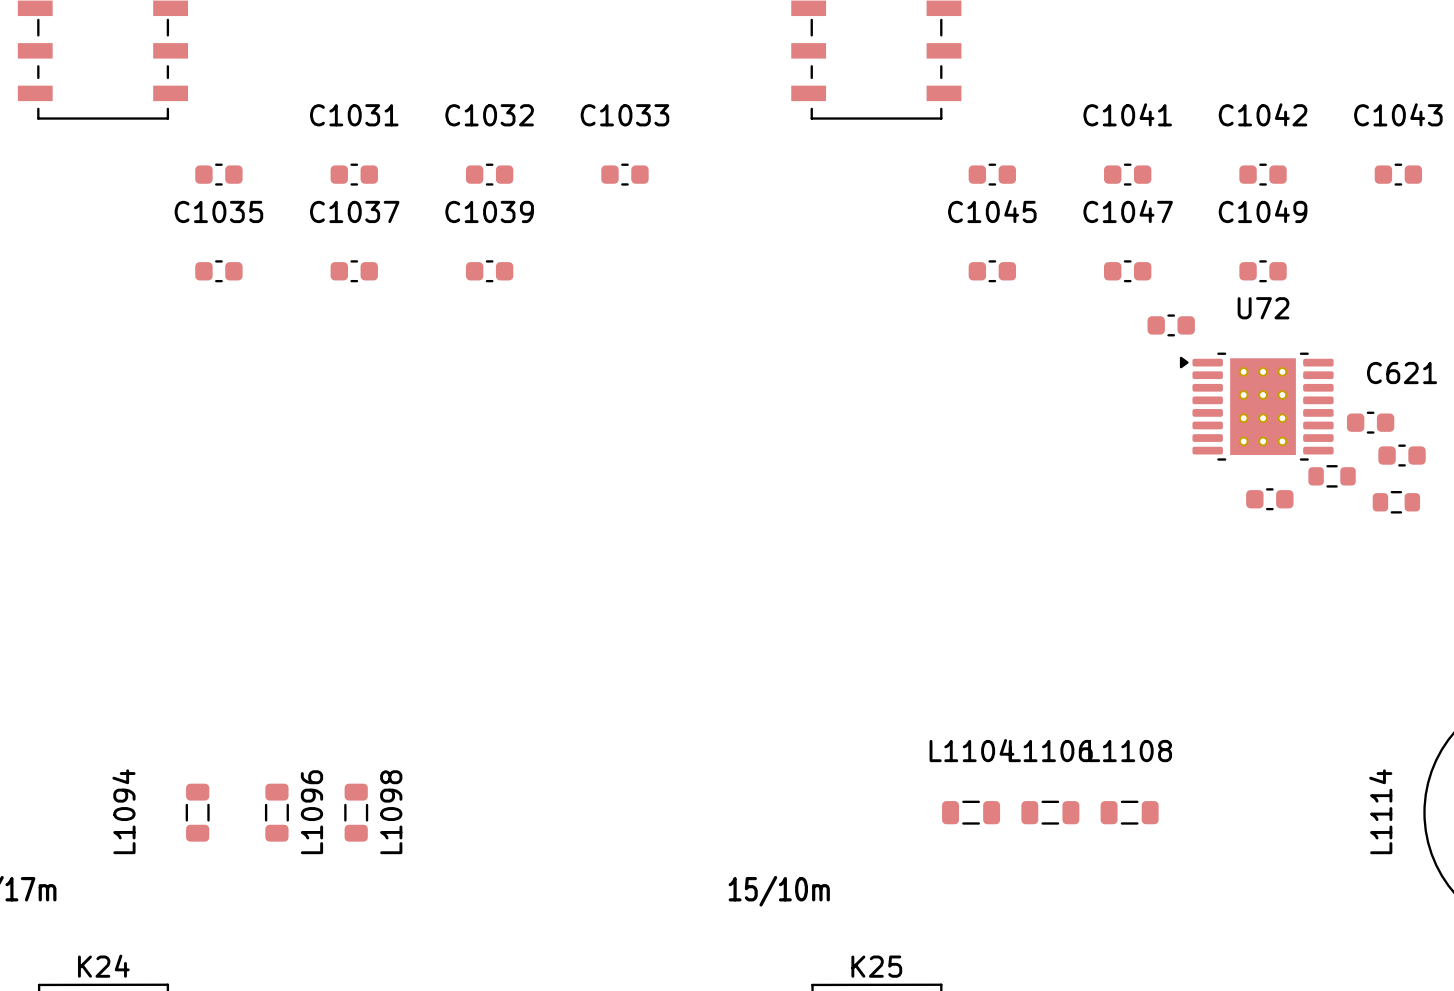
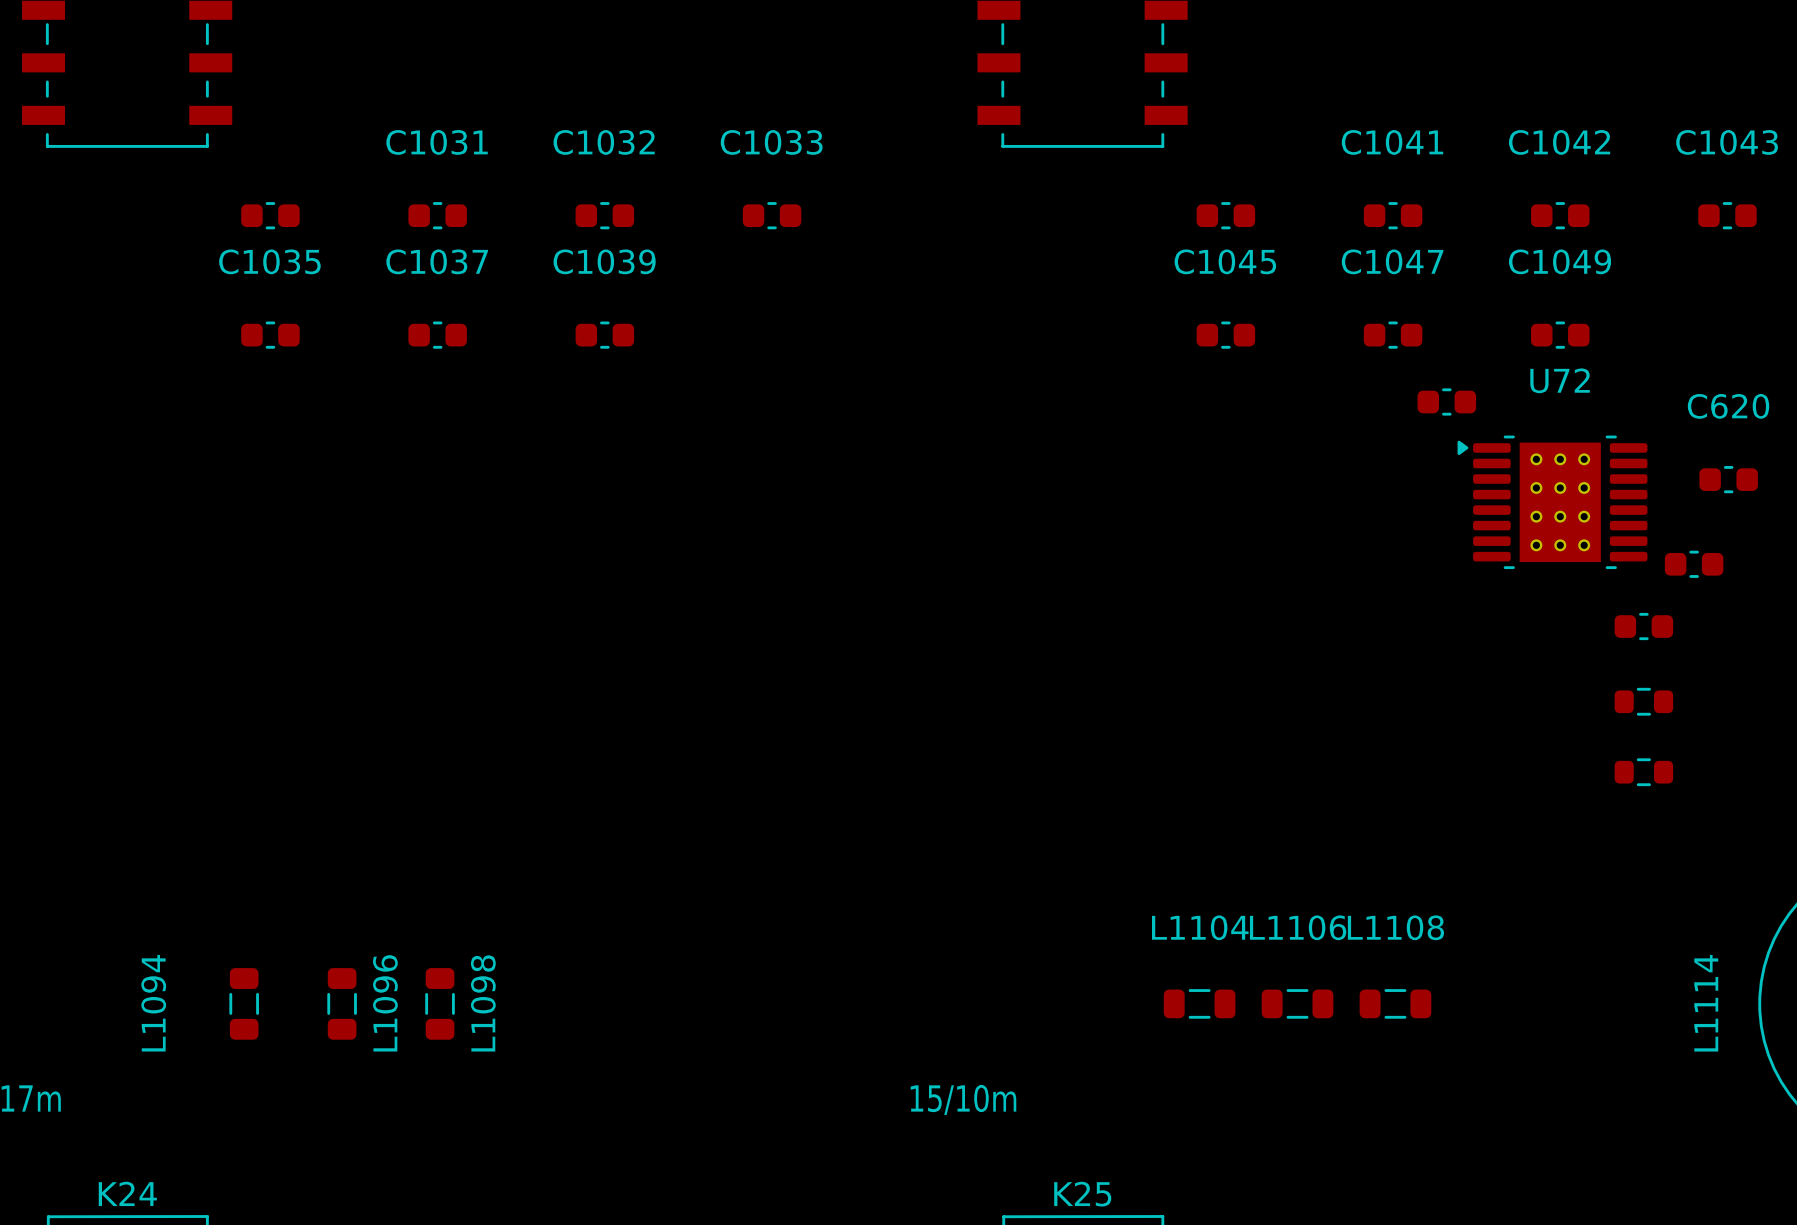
C620: none -> (1728, 479)
part position: (1370, 422) -> (1694, 564)
C621: (1402, 455) -> none
part: (1332, 476) -> none
part: (1269, 499) -> none
part: (1396, 502) -> none
part: none -> (1643, 626)
part: none -> (1643, 701)
part: none -> (1643, 772)

